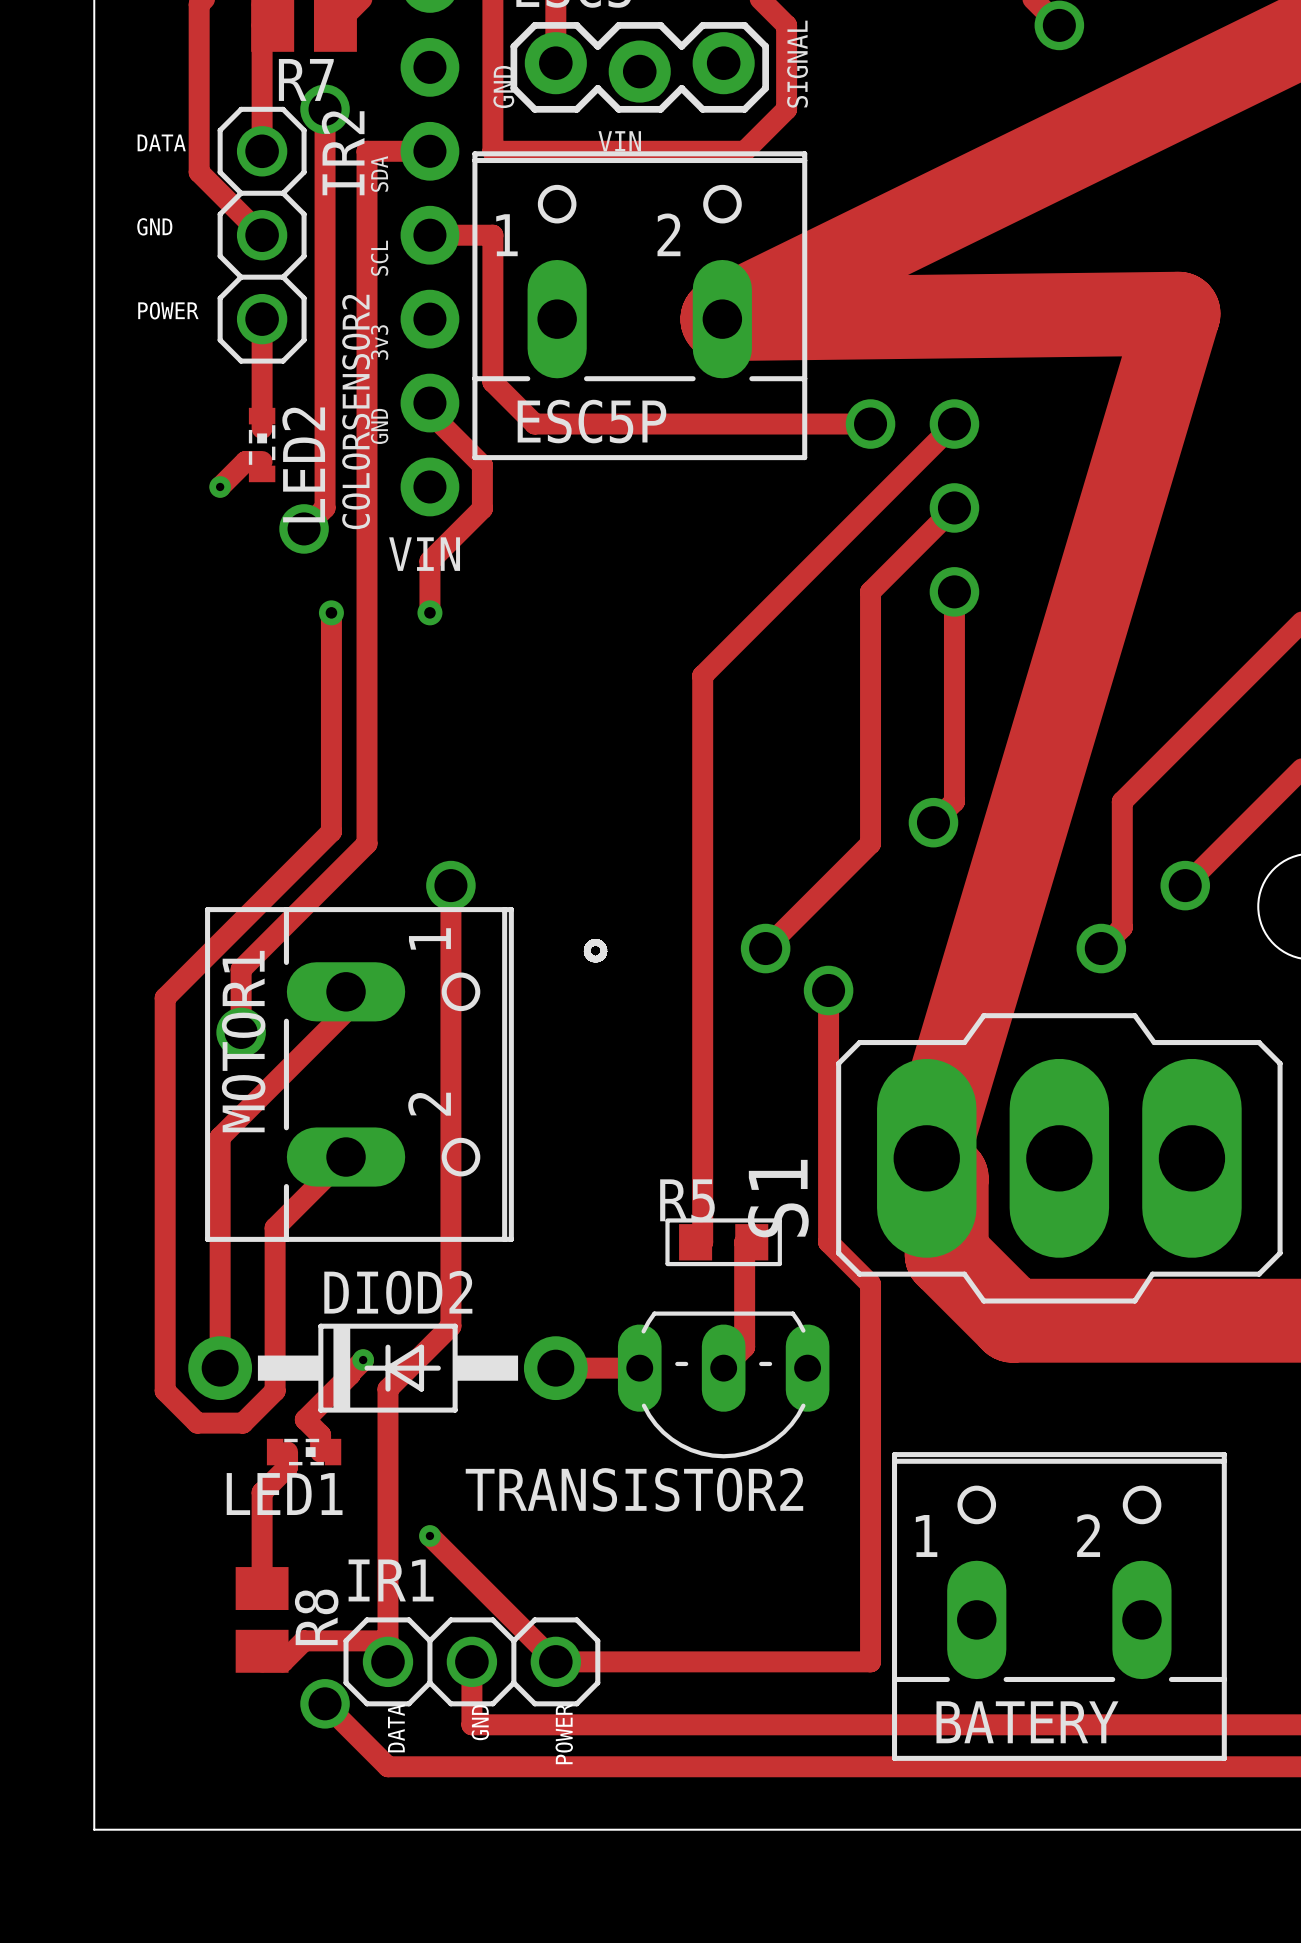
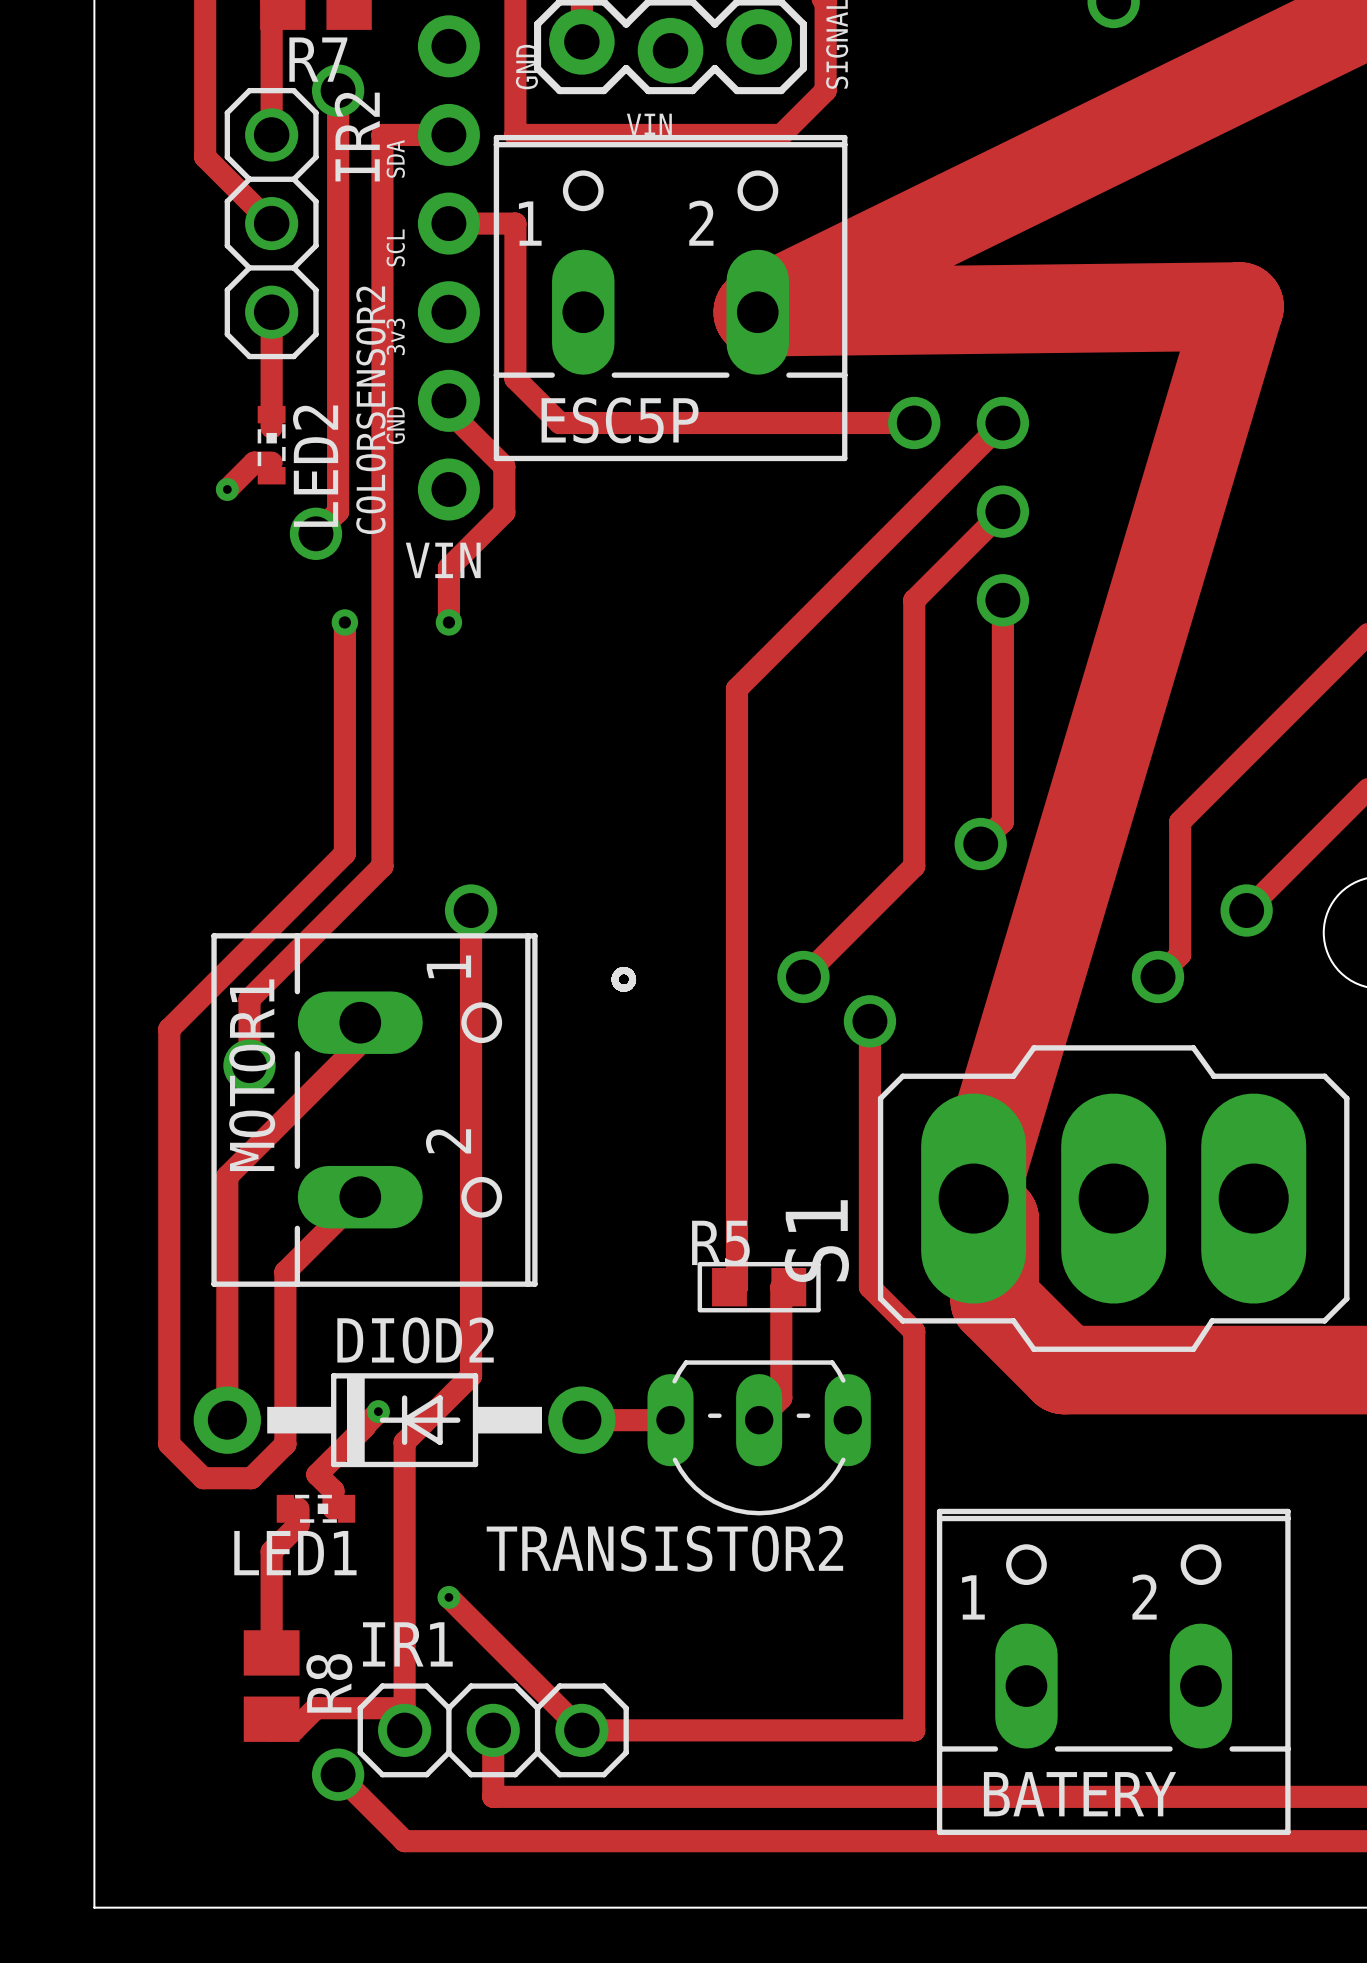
text: DATA (161, 142) -> none
text: GND (154, 226) -> none
text: POWER (168, 310) -> none
text: GND (480, 1722) -> none
text: DATA (396, 1728) -> none
text: POWER (564, 1734) -> none

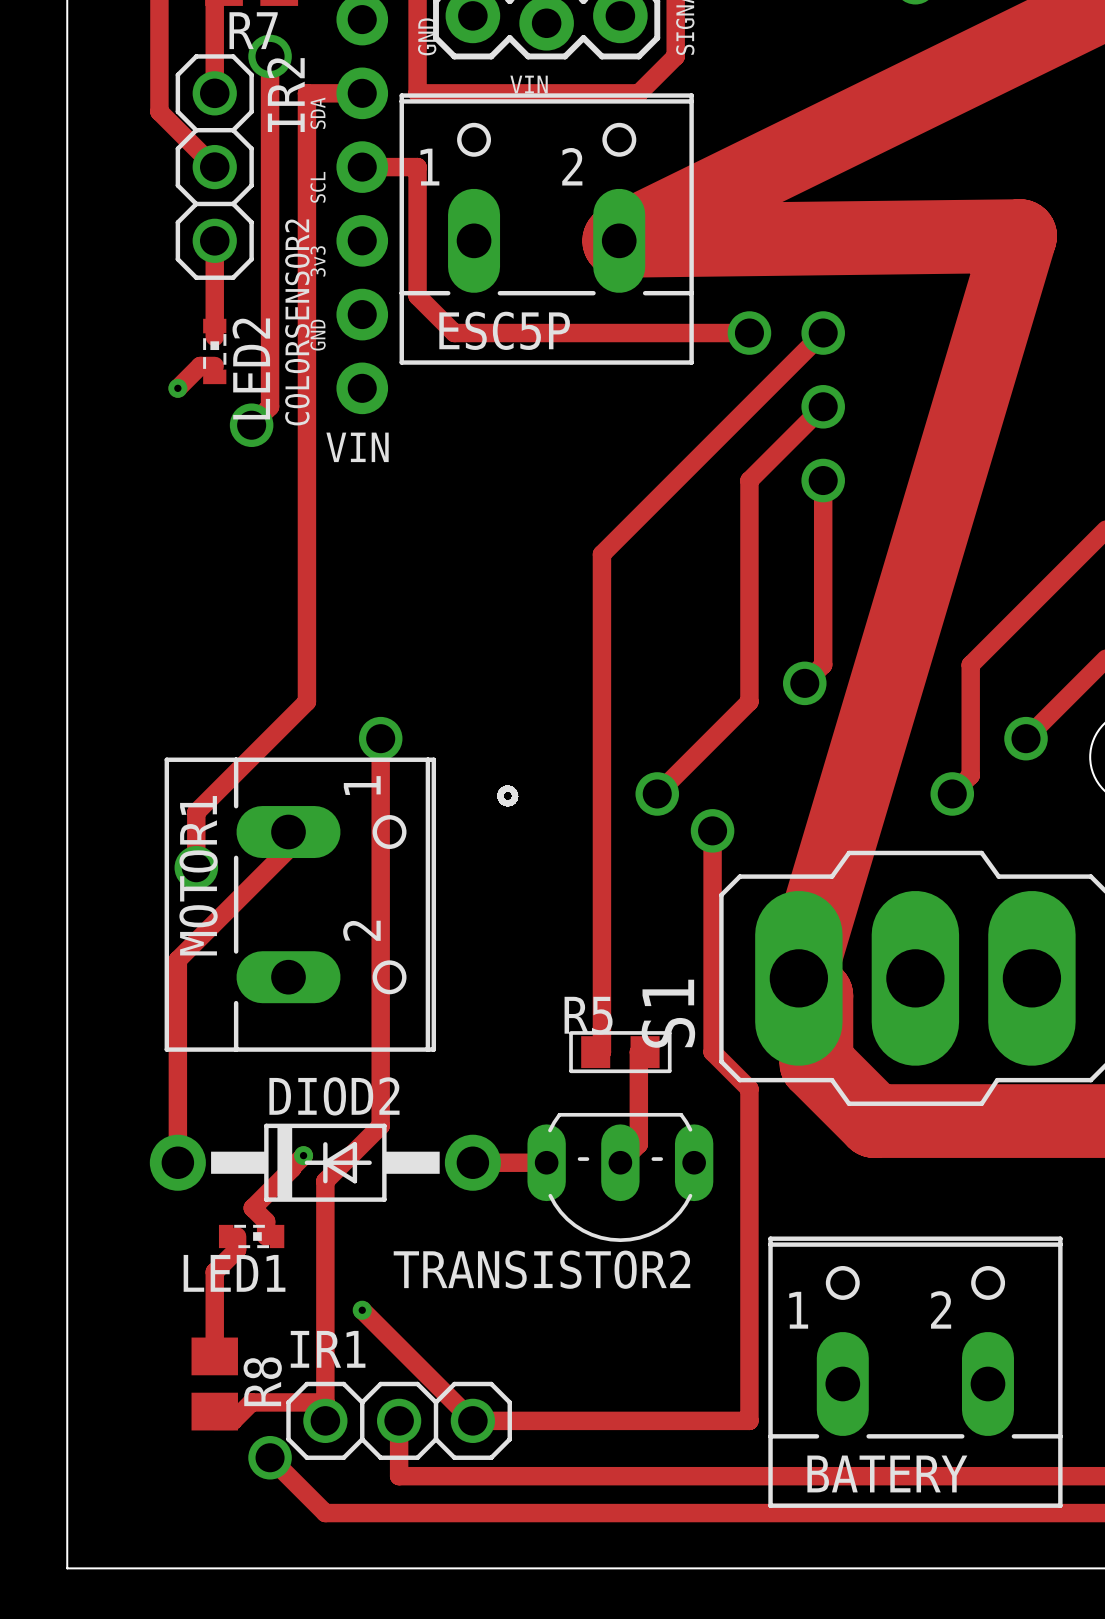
track: (448, 400) (448, 411) (504, 466) (504, 512) (448, 567) (448, 622) -> none
track: (344, 622) (344, 853) (169, 1029) (169, 1444) (203, 1478) (251, 1478) (285, 1444) (285, 1272) (360, 1197) -> none
via: (344, 622) -> none
via: (448, 622) -> none

